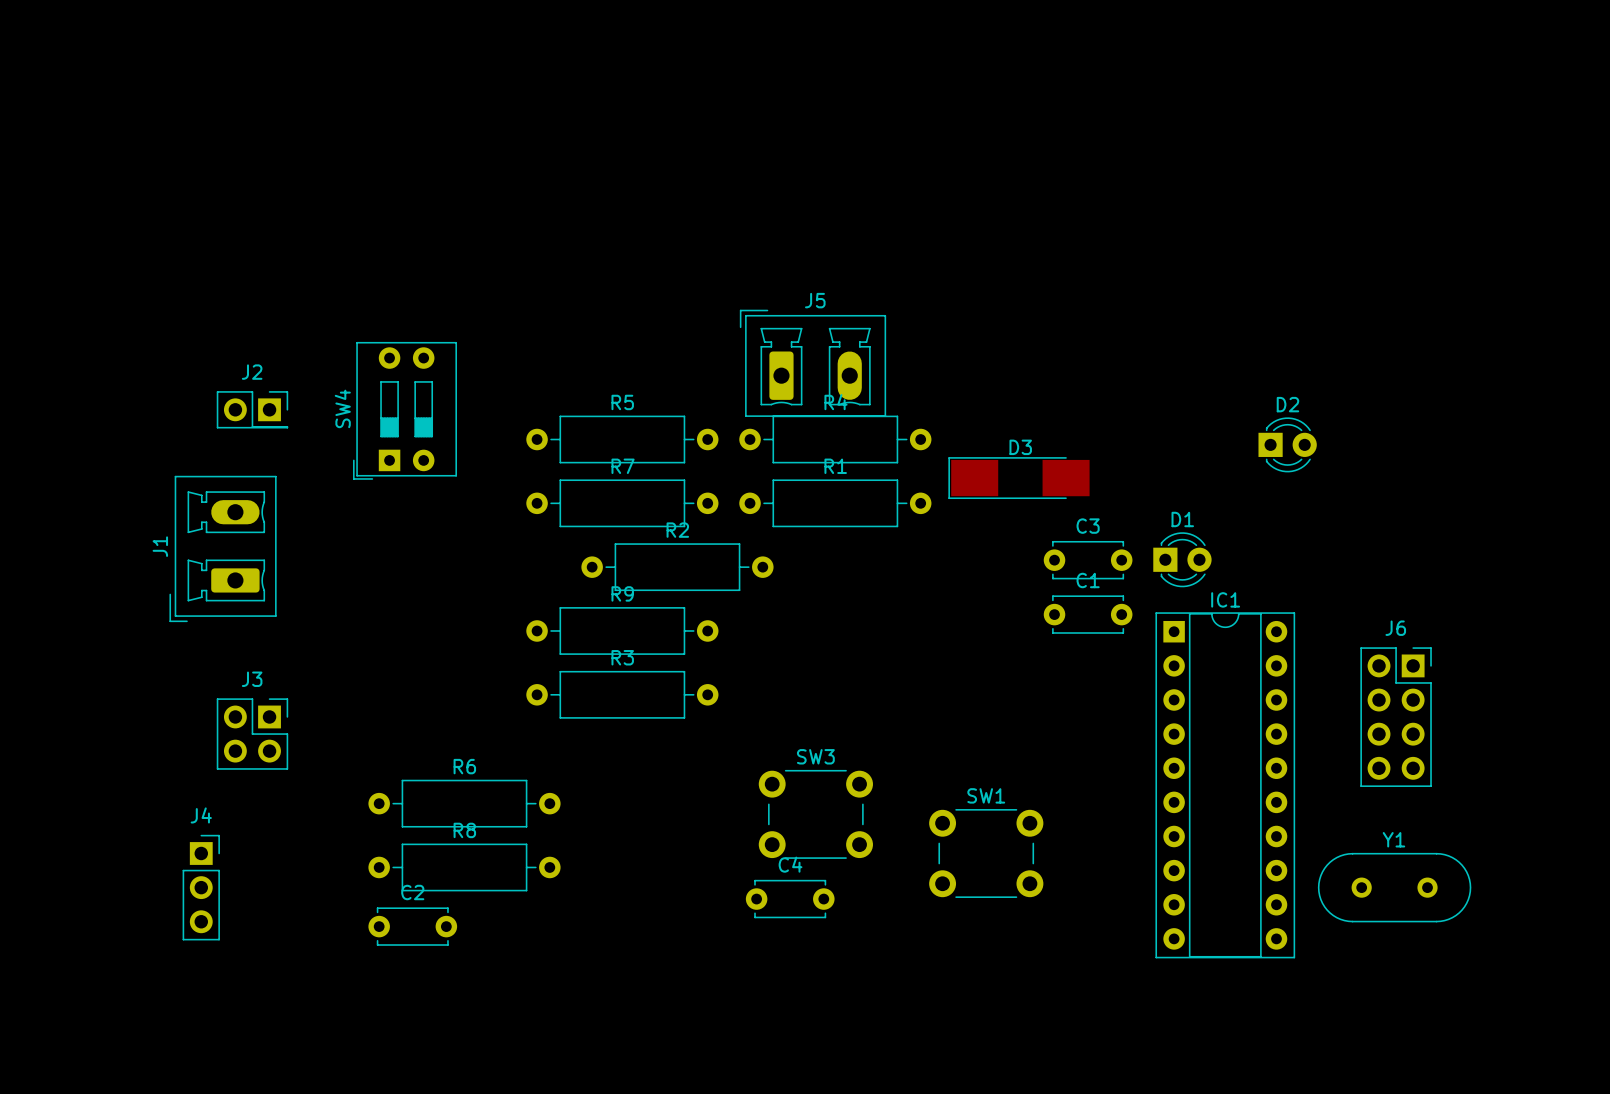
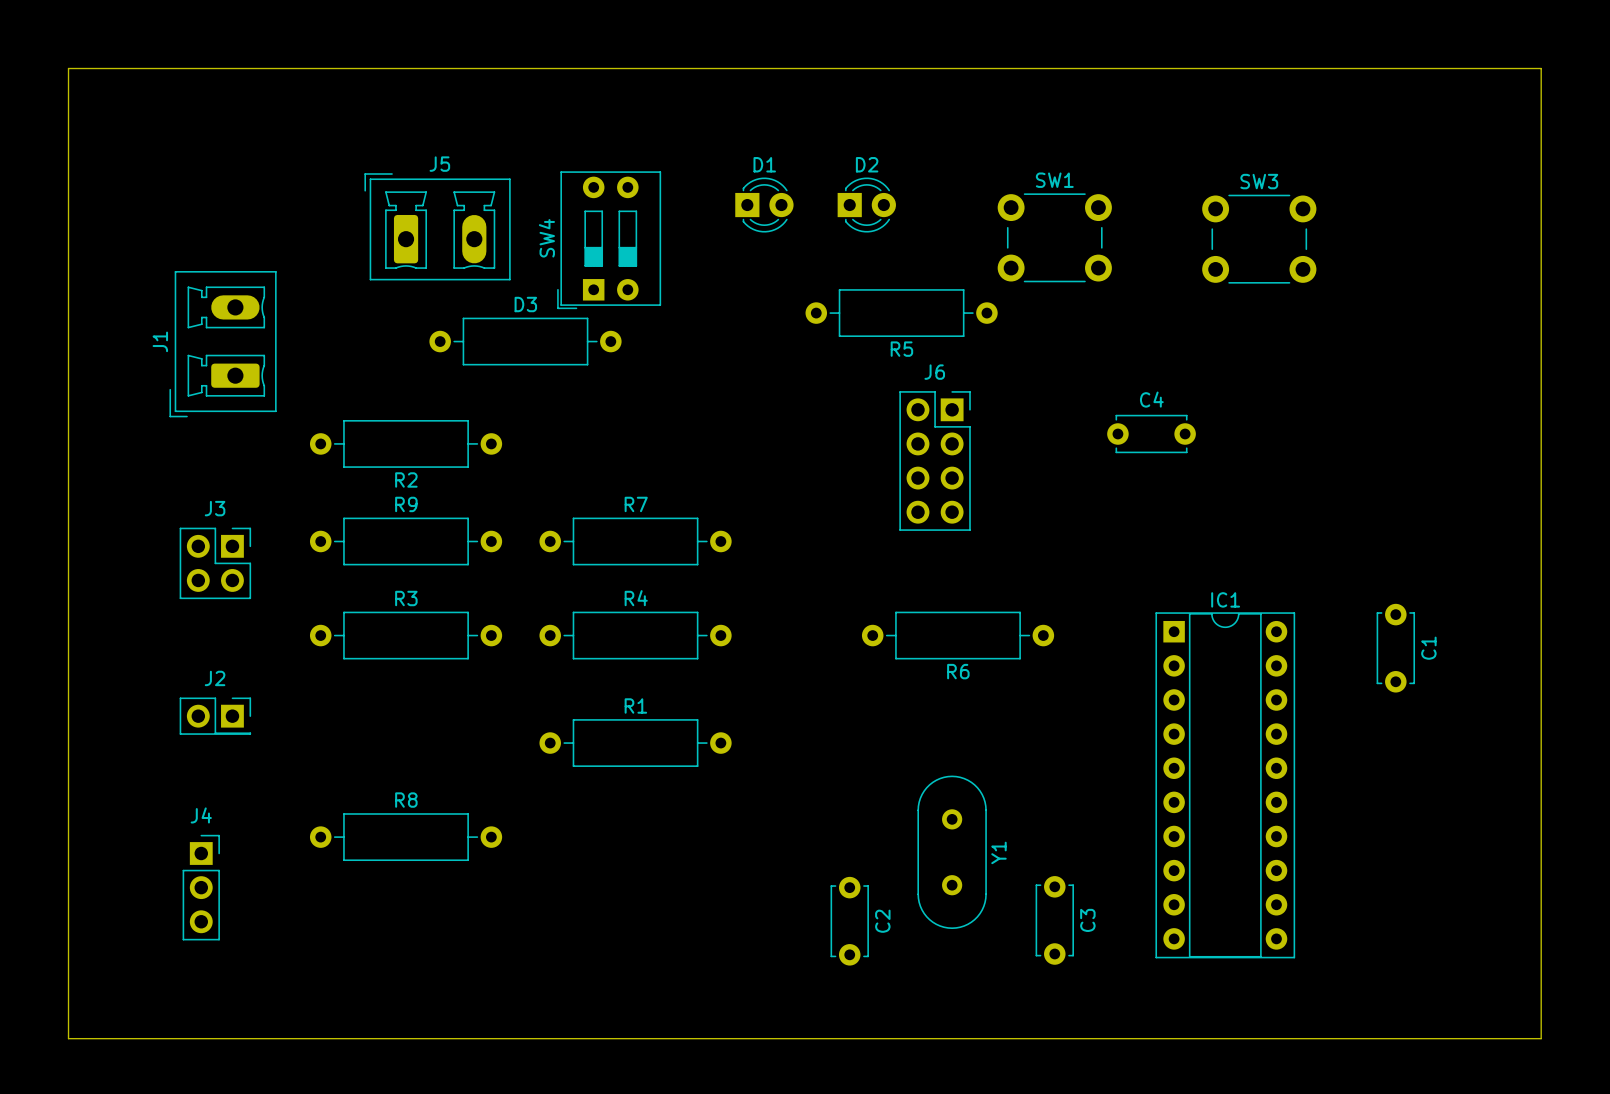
board edge: none -> (68, 68) (1541, 68) (1541, 1038) (68, 1038) (68, 68)
J5 position: (812, 363) -> (437, 226)
R5 name position: R5 (622, 402) -> R5 (901, 349)
J2 position: (252, 409) -> (215, 716)
SW4 position: (405, 410) -> (609, 240)
R5 position: (622, 439) -> (901, 313)
R4 position: (835, 439) -> (635, 635)
D2 position: (1287, 444) -> (866, 205)
D3 footprint: [948, 457, 1090, 500] -> [429, 317, 622, 366]
R7 position: (622, 503) -> (635, 541)
R1 position: (835, 503) -> (635, 743)
R2 name position: R2 (677, 530) -> R2 (406, 479)
J1 position: (223, 548) -> (223, 344)
D1 position: (1182, 559) -> (764, 205)
C3 rotation: 0° (1088, 560) -> 90° clockwise (1054, 920)
C3 position: (1088, 560) -> (1054, 920)
R2 position: (677, 567) -> (406, 443)
C1 rotation: 0° (1088, 614) -> 90° clockwise (1395, 648)
C1 position: (1088, 614) -> (1395, 648)
R9 position: (622, 630) -> (406, 541)
R3 position: (622, 694) -> (406, 635)
J6 position: (1396, 717) -> (935, 461)
J3 position: (252, 734) -> (215, 563)
R6 name position: R6 (464, 766) -> R6 (958, 671)
R6 position: (464, 803) -> (958, 635)
SW3 position: (815, 814) -> (1259, 239)
SW1 position: (986, 853) -> (1054, 237)
R8 position: (464, 867) -> (406, 837)
Y1 rotation: 0° (1394, 887) -> 90° clockwise (952, 852)
Y1 position: (1394, 887) -> (952, 852)
C4 position: (790, 899) -> (1151, 434)
C2 rotation: 0° (412, 926) -> 90° clockwise (849, 921)
C2 position: (412, 926) -> (849, 921)

